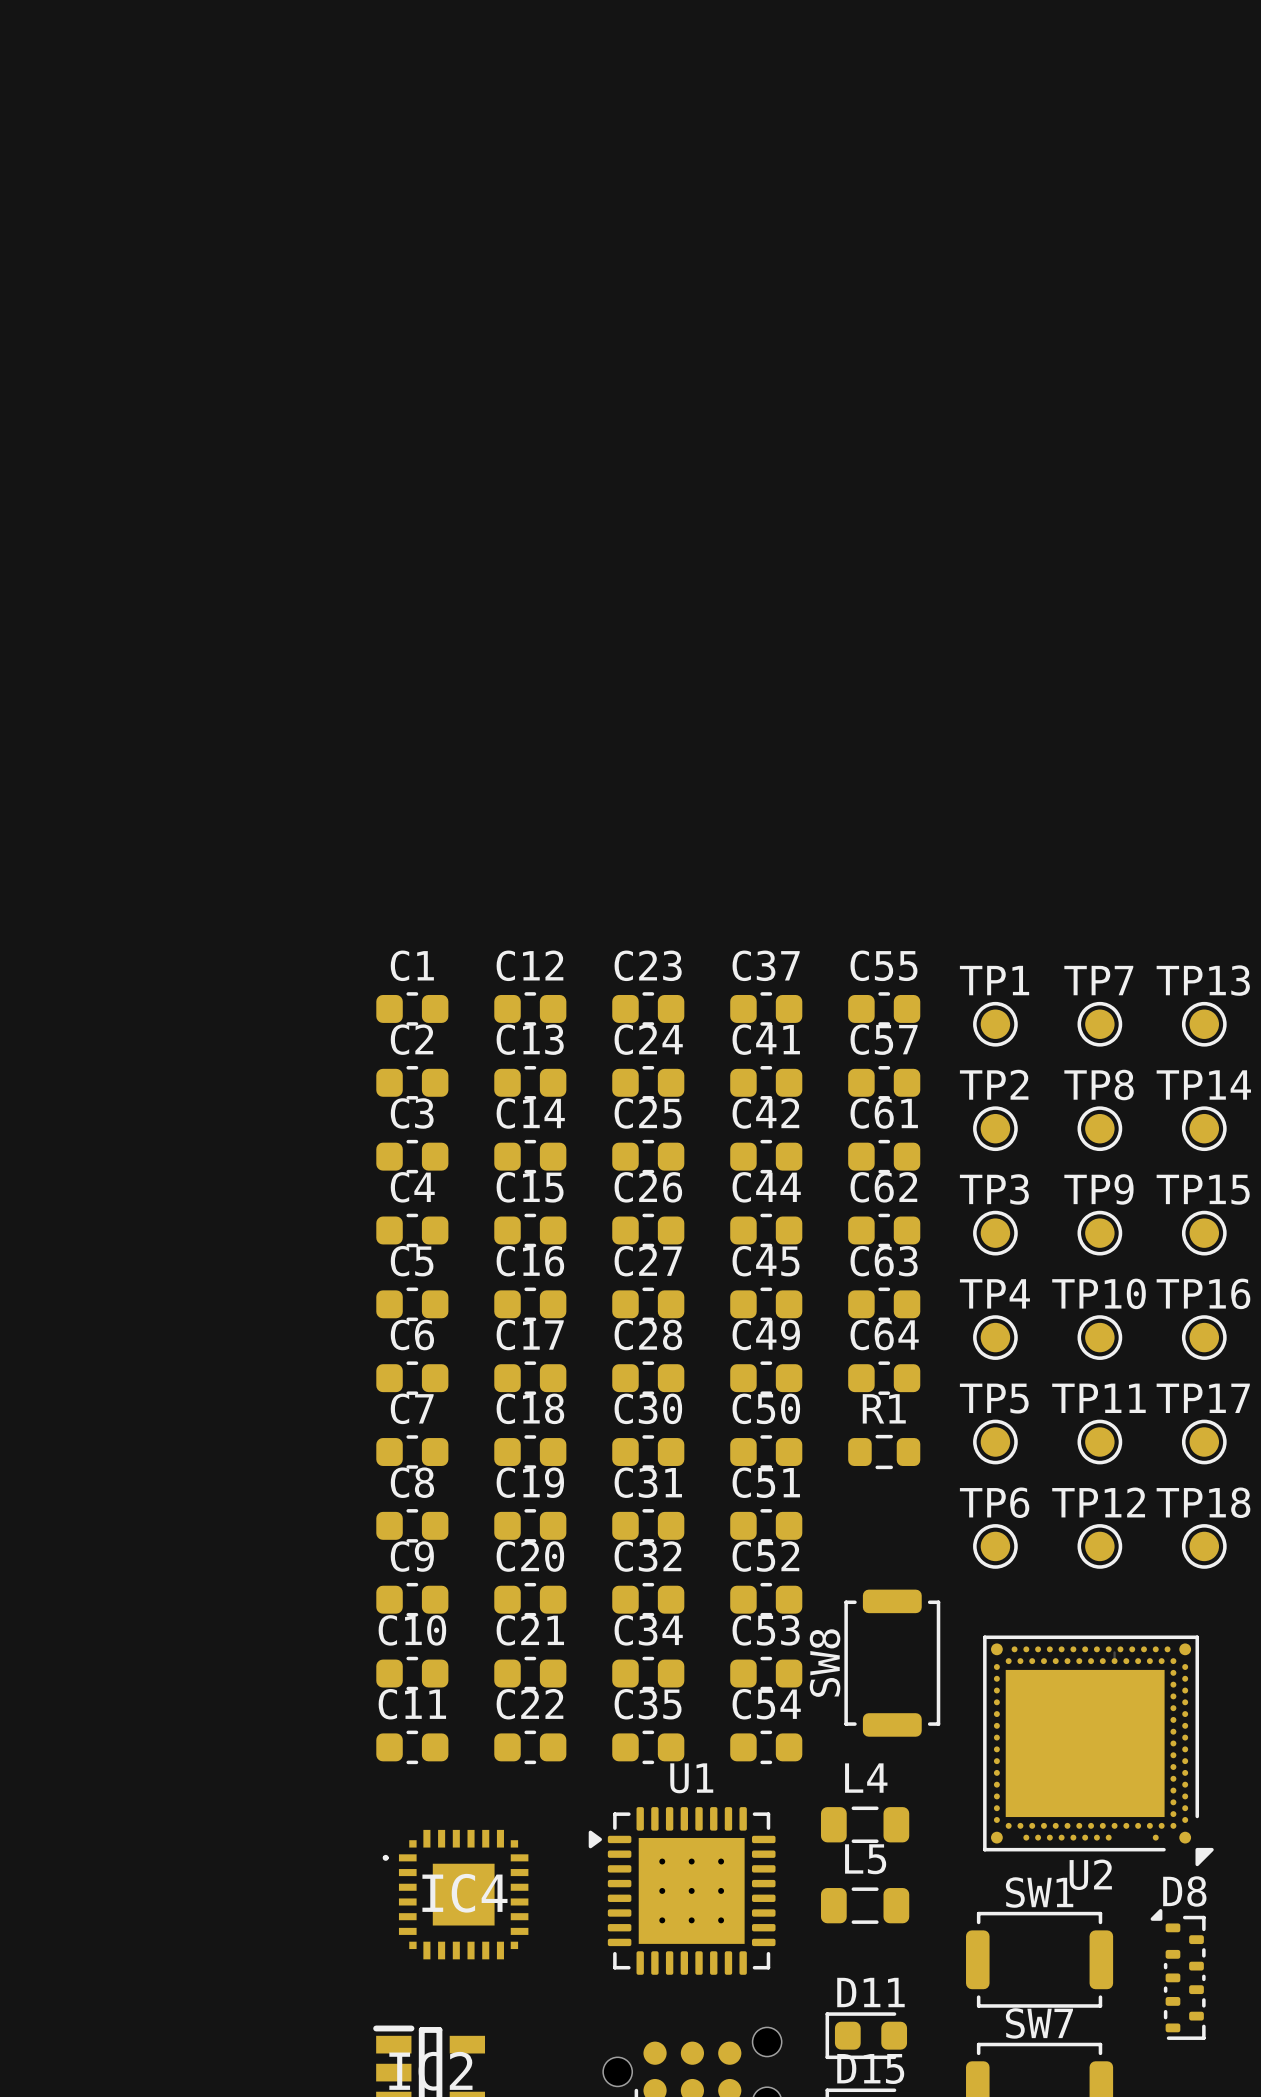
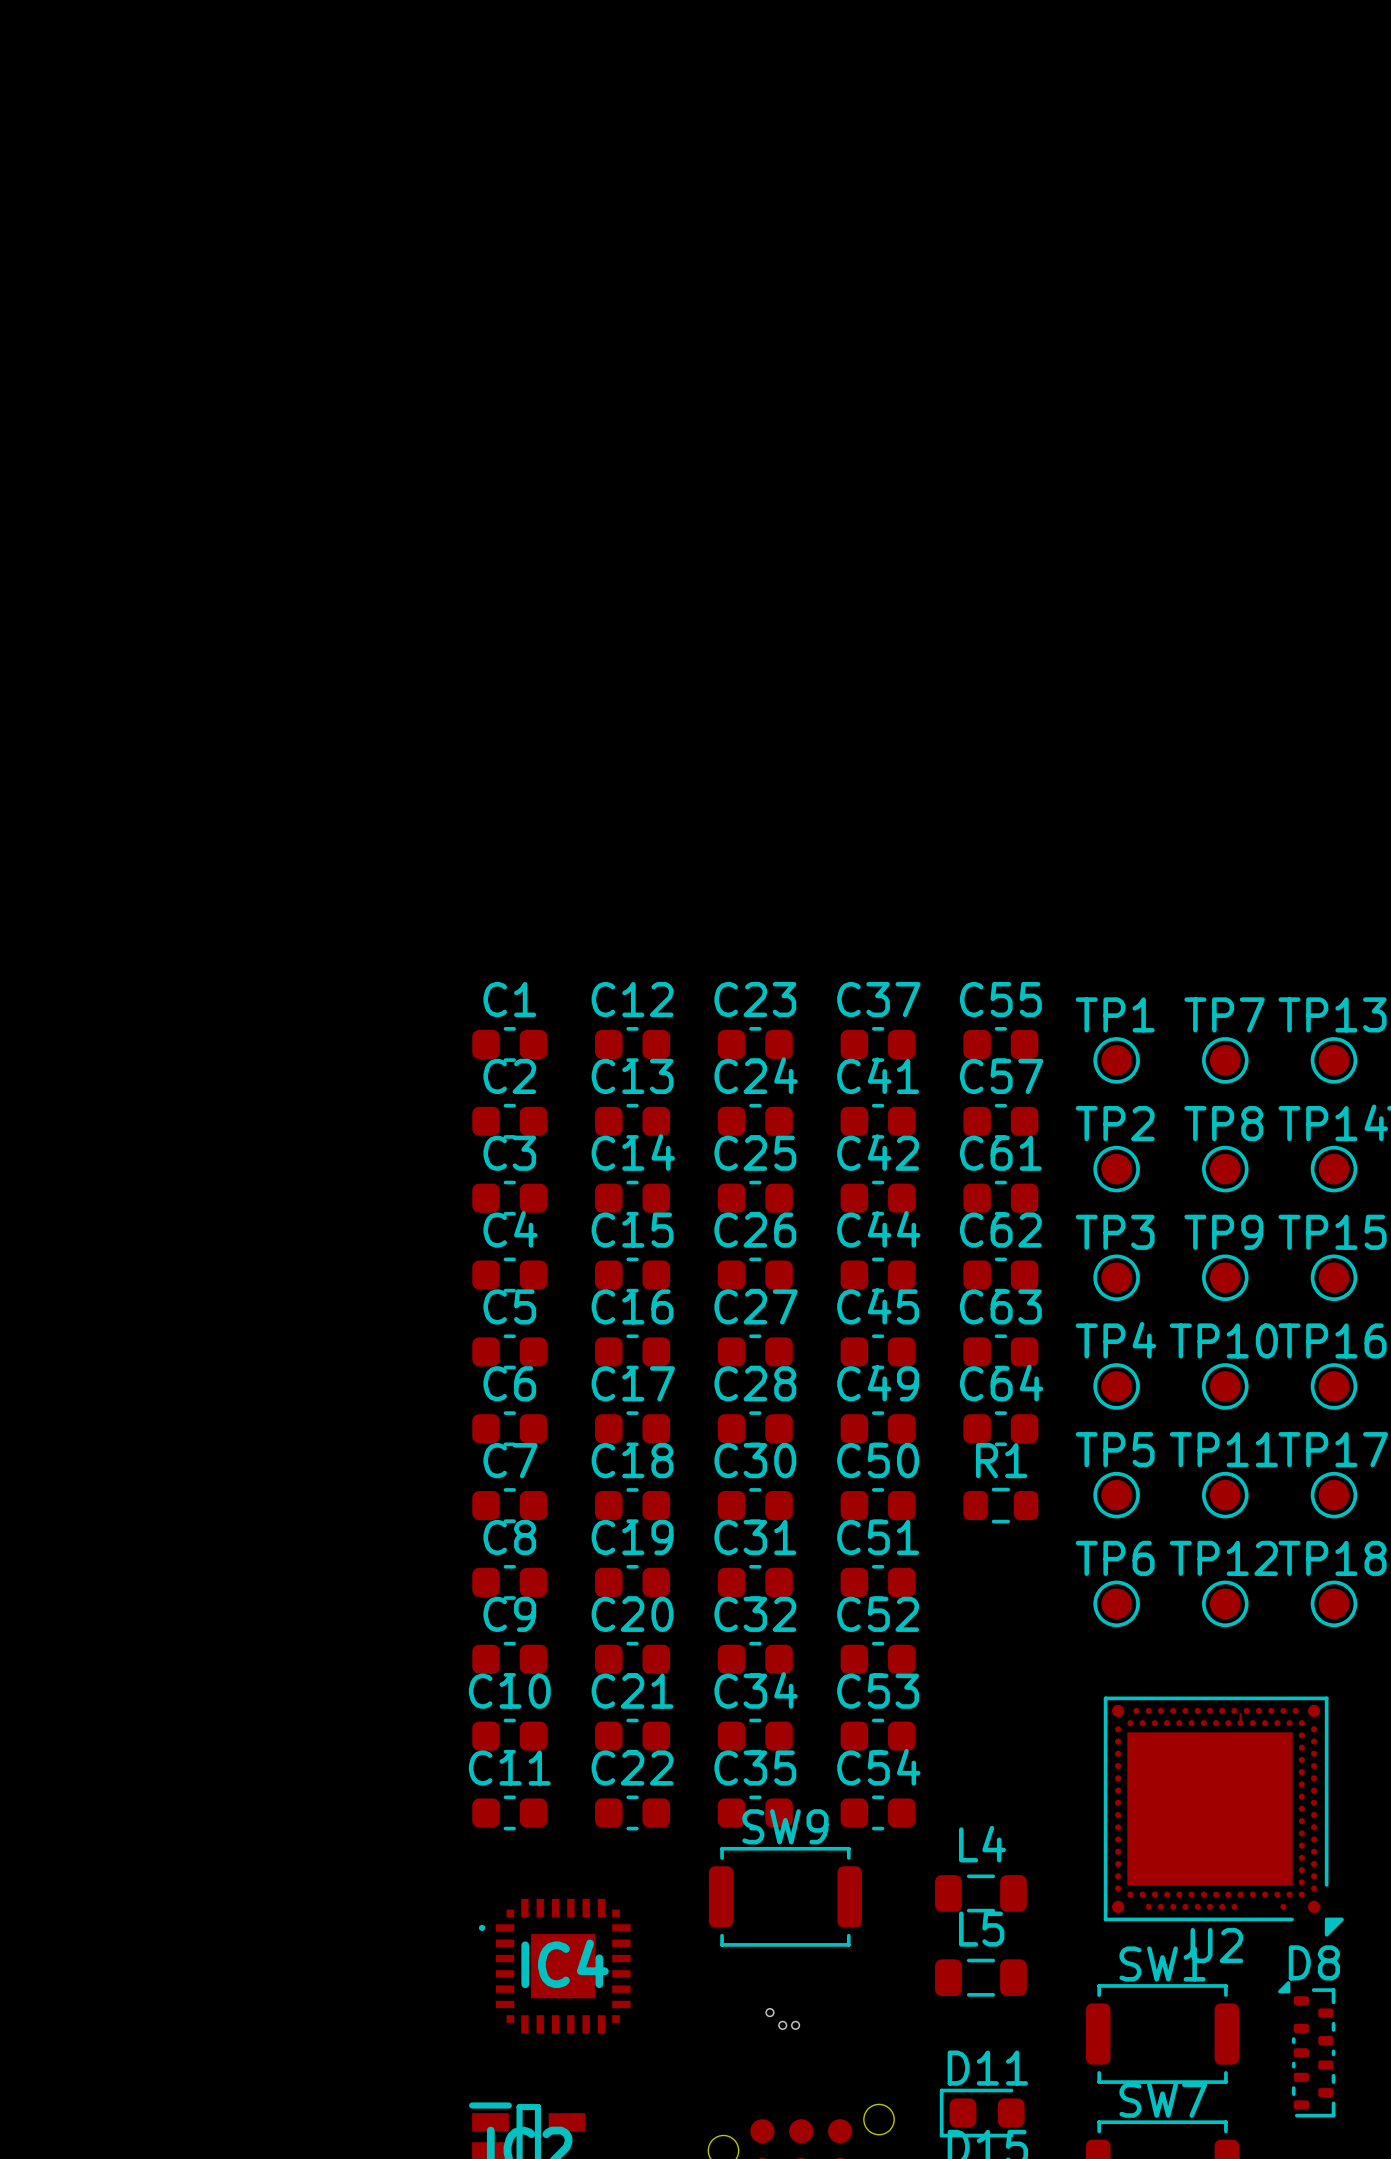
SW8: (892, 1663) -> none
SW9: none -> (785, 1896)
U1: (682, 1890) -> none
via: none -> (769, 2012)
via: none -> (782, 2025)
via: none -> (795, 2025)

